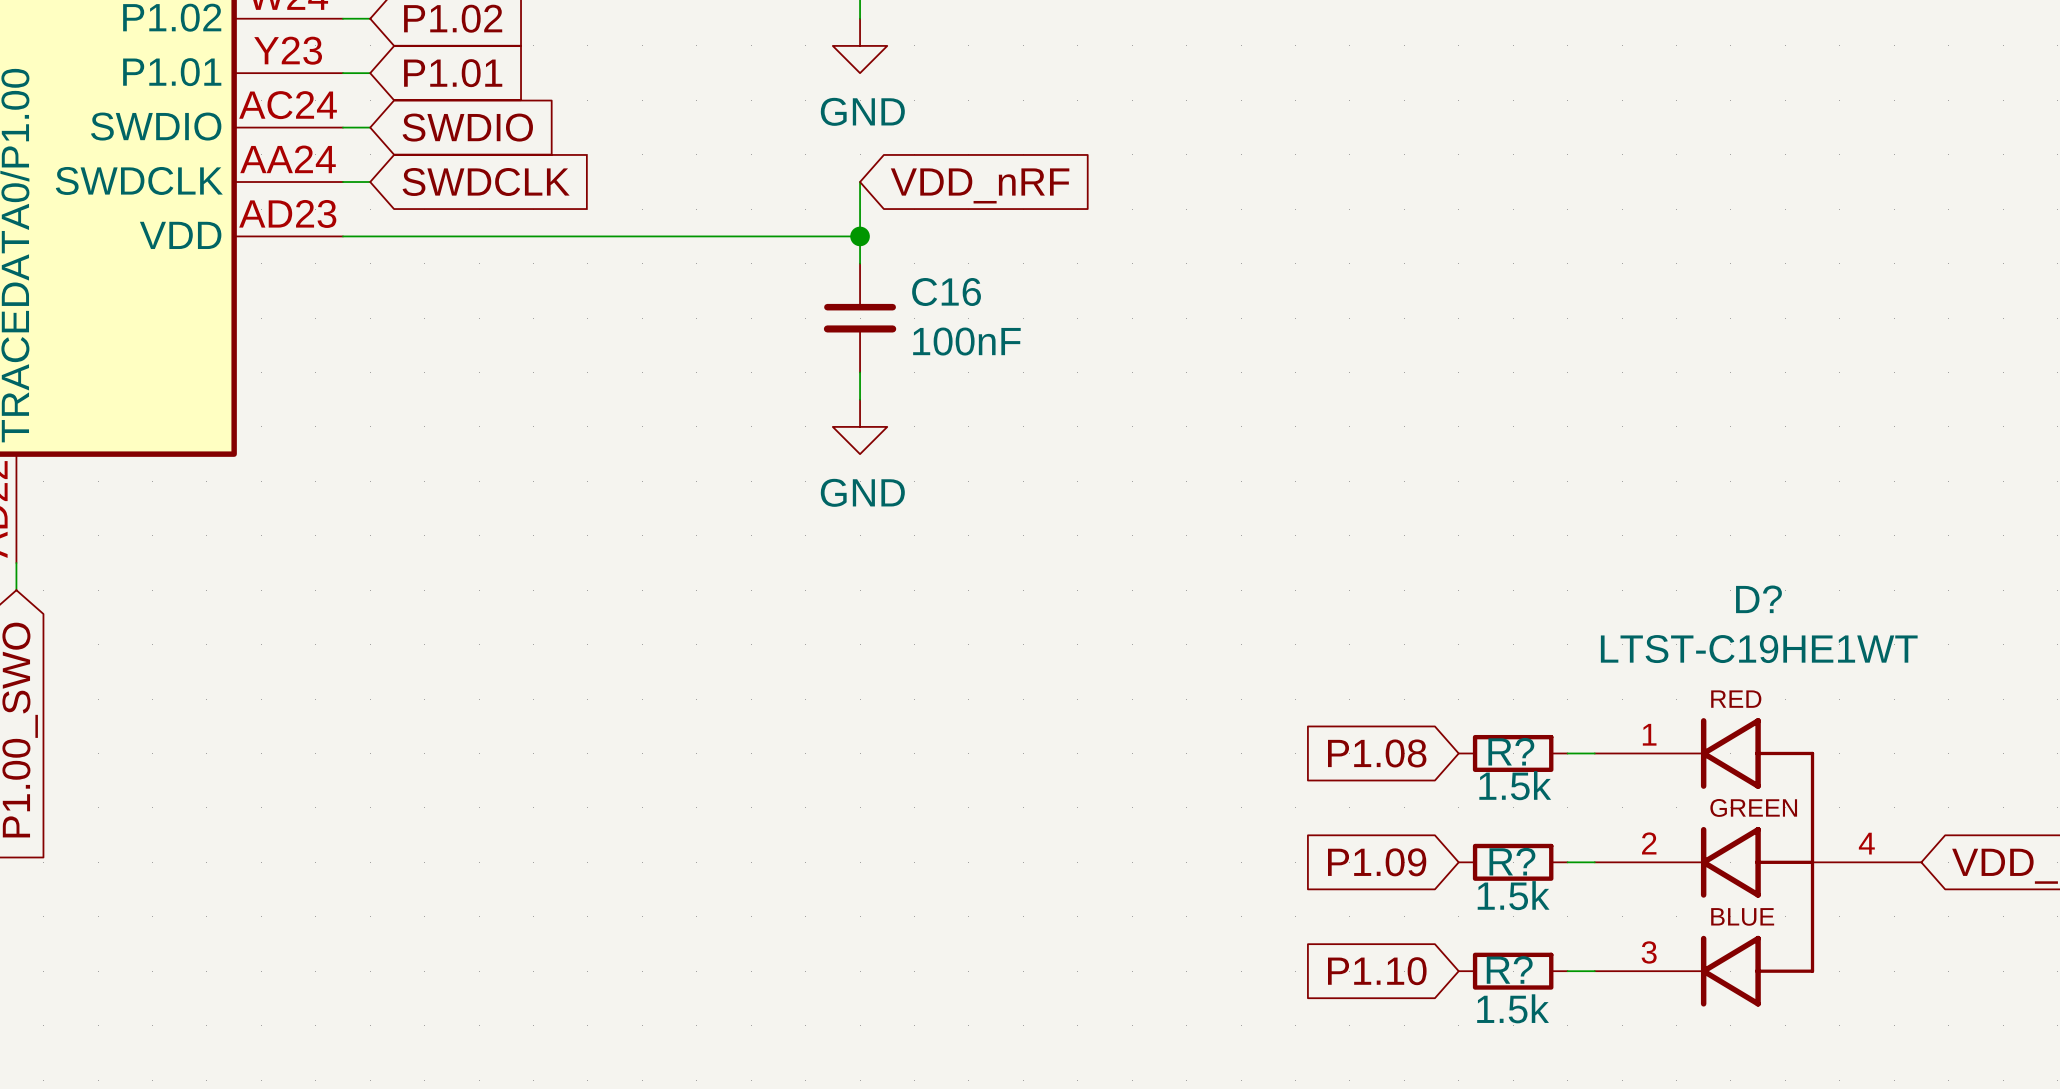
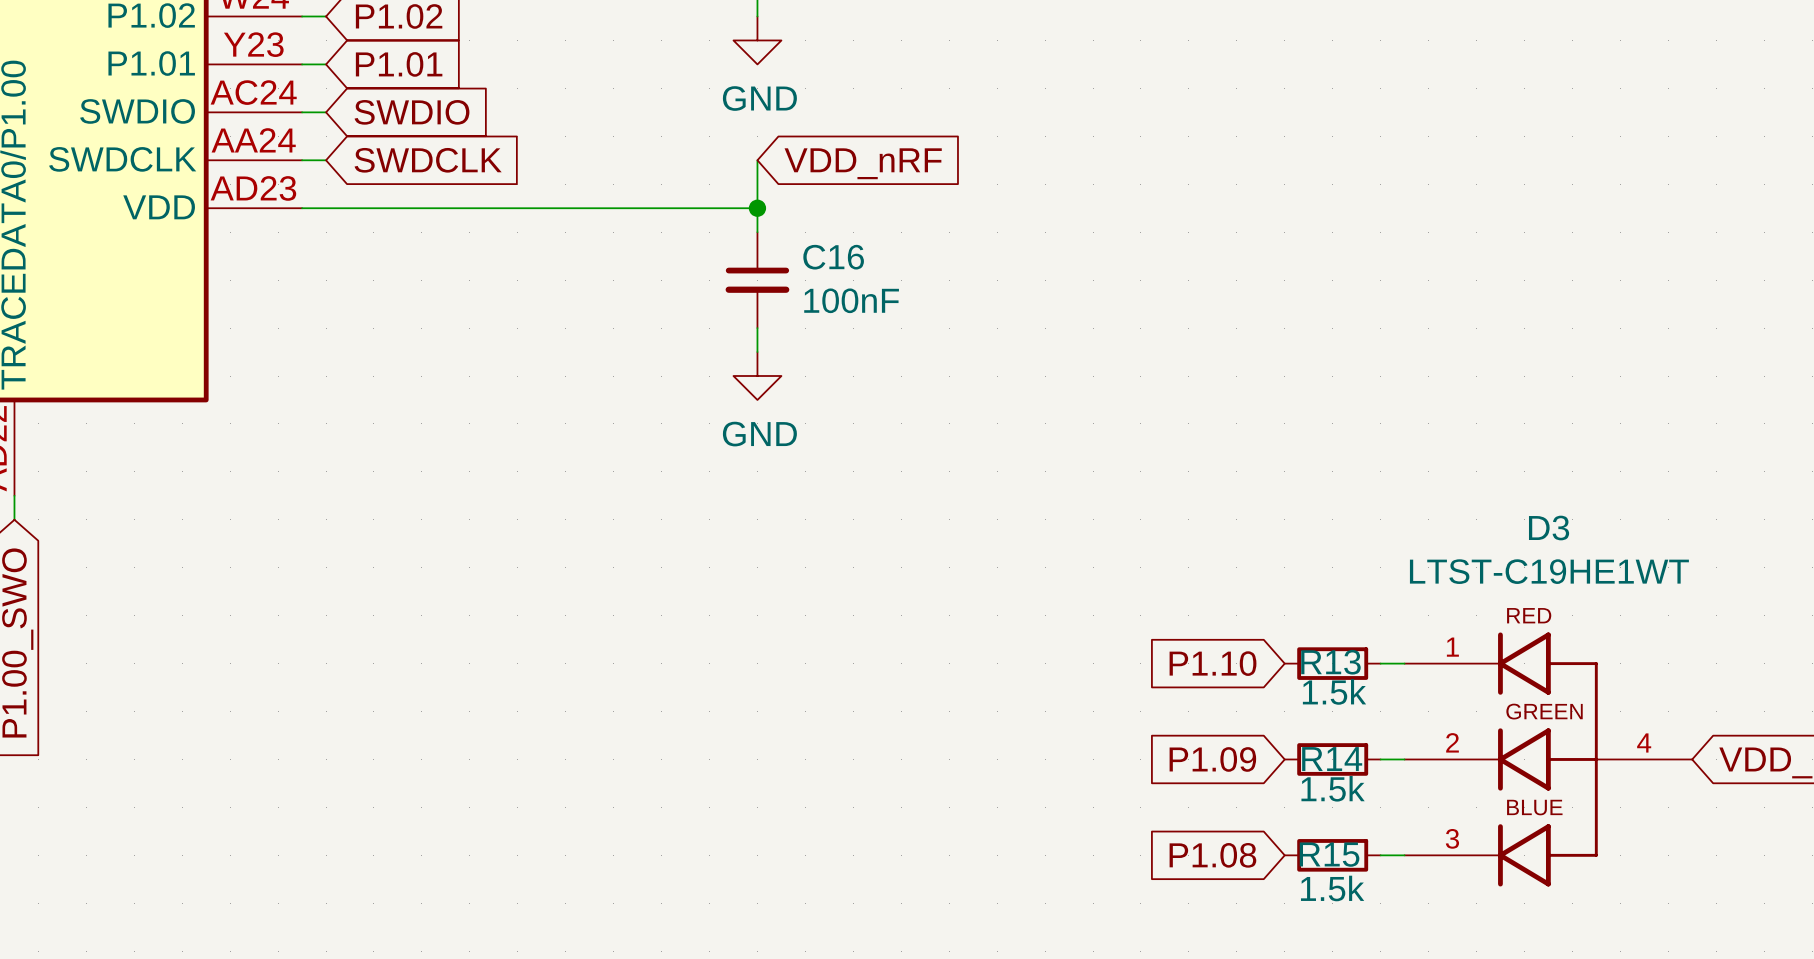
D? name: D? (1758, 599) -> D3 (1549, 528)
R? name: R? (1511, 751) -> R13 (1330, 662)
global label: P1.08 (1377, 753) -> P1.10 (1213, 663)
R? name: R? (1512, 861) -> R14 (1332, 759)
R? name: R? (1509, 969) -> R15 (1329, 854)
global label: P1.10 (1377, 971) -> P1.08 (1212, 855)

